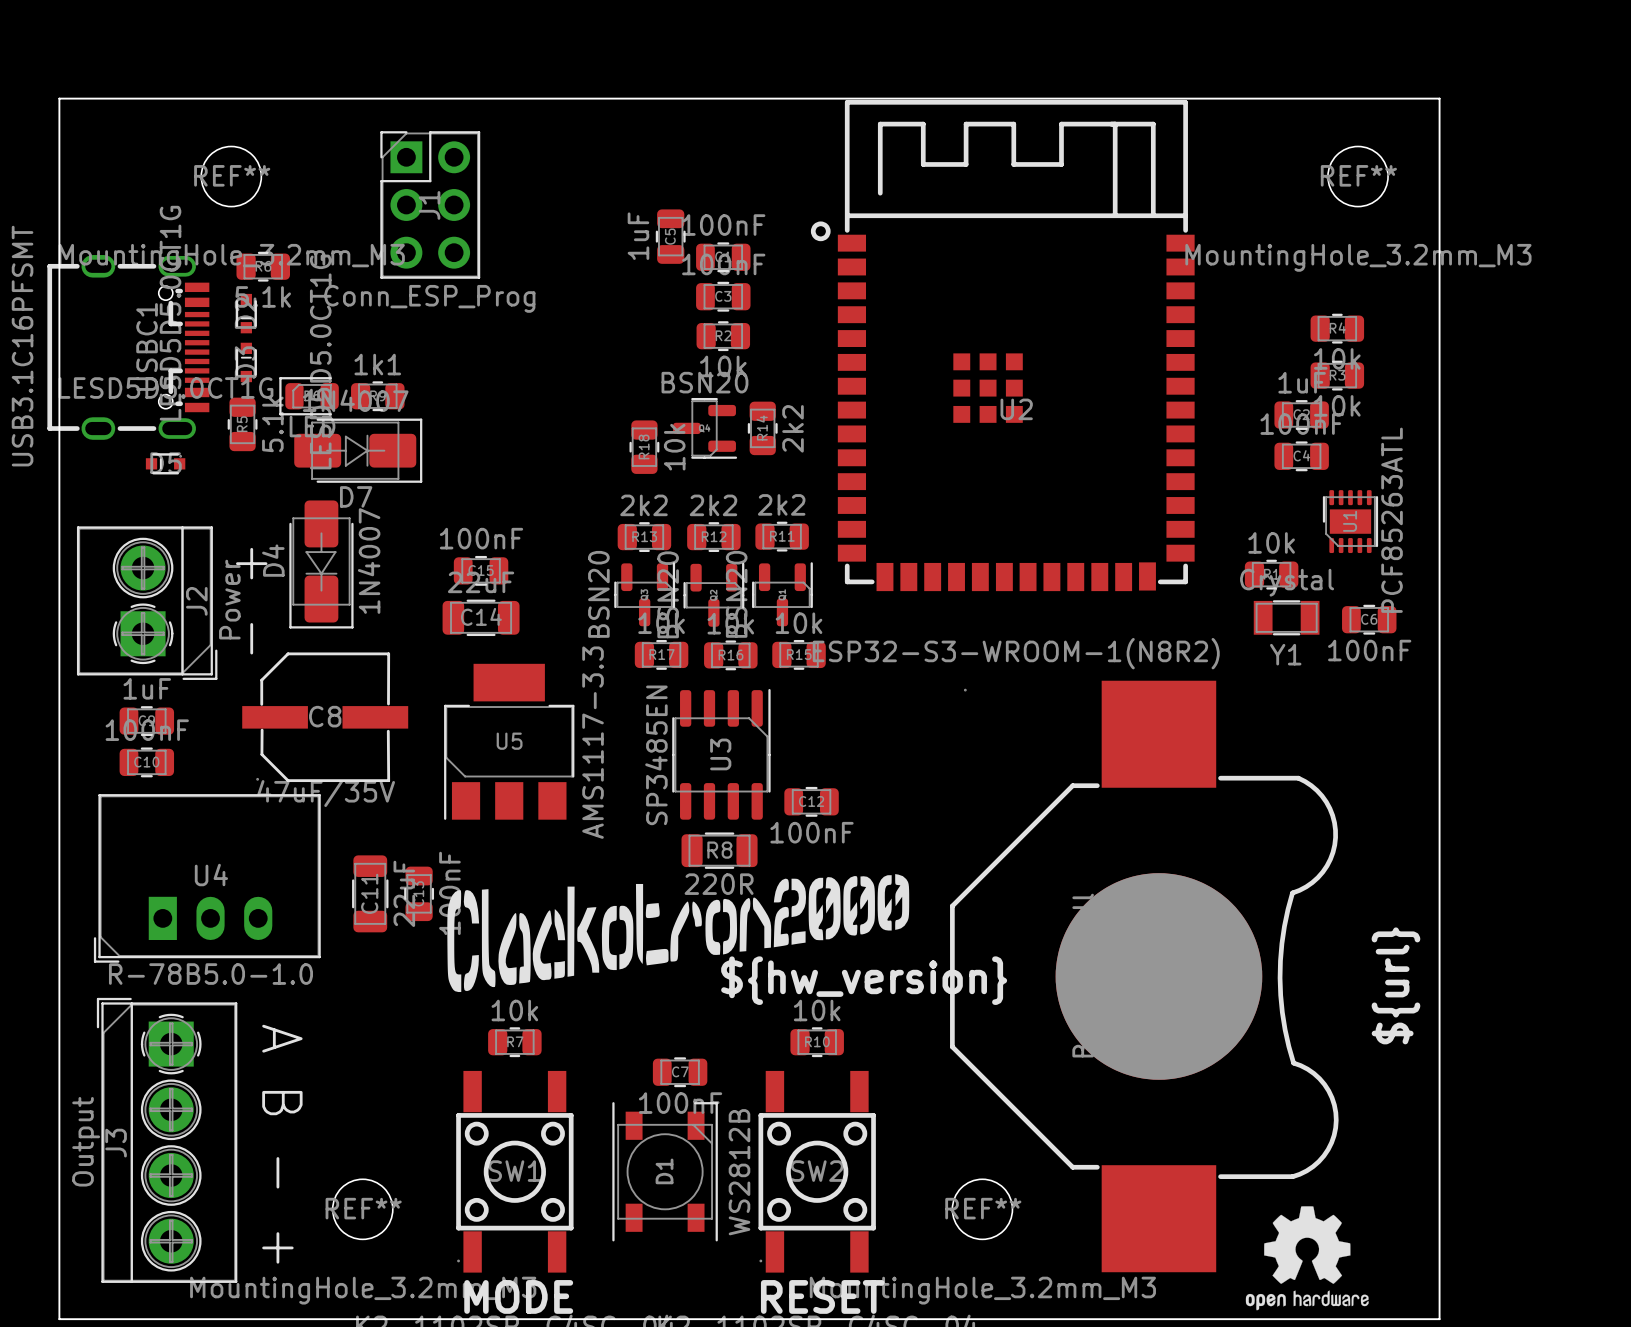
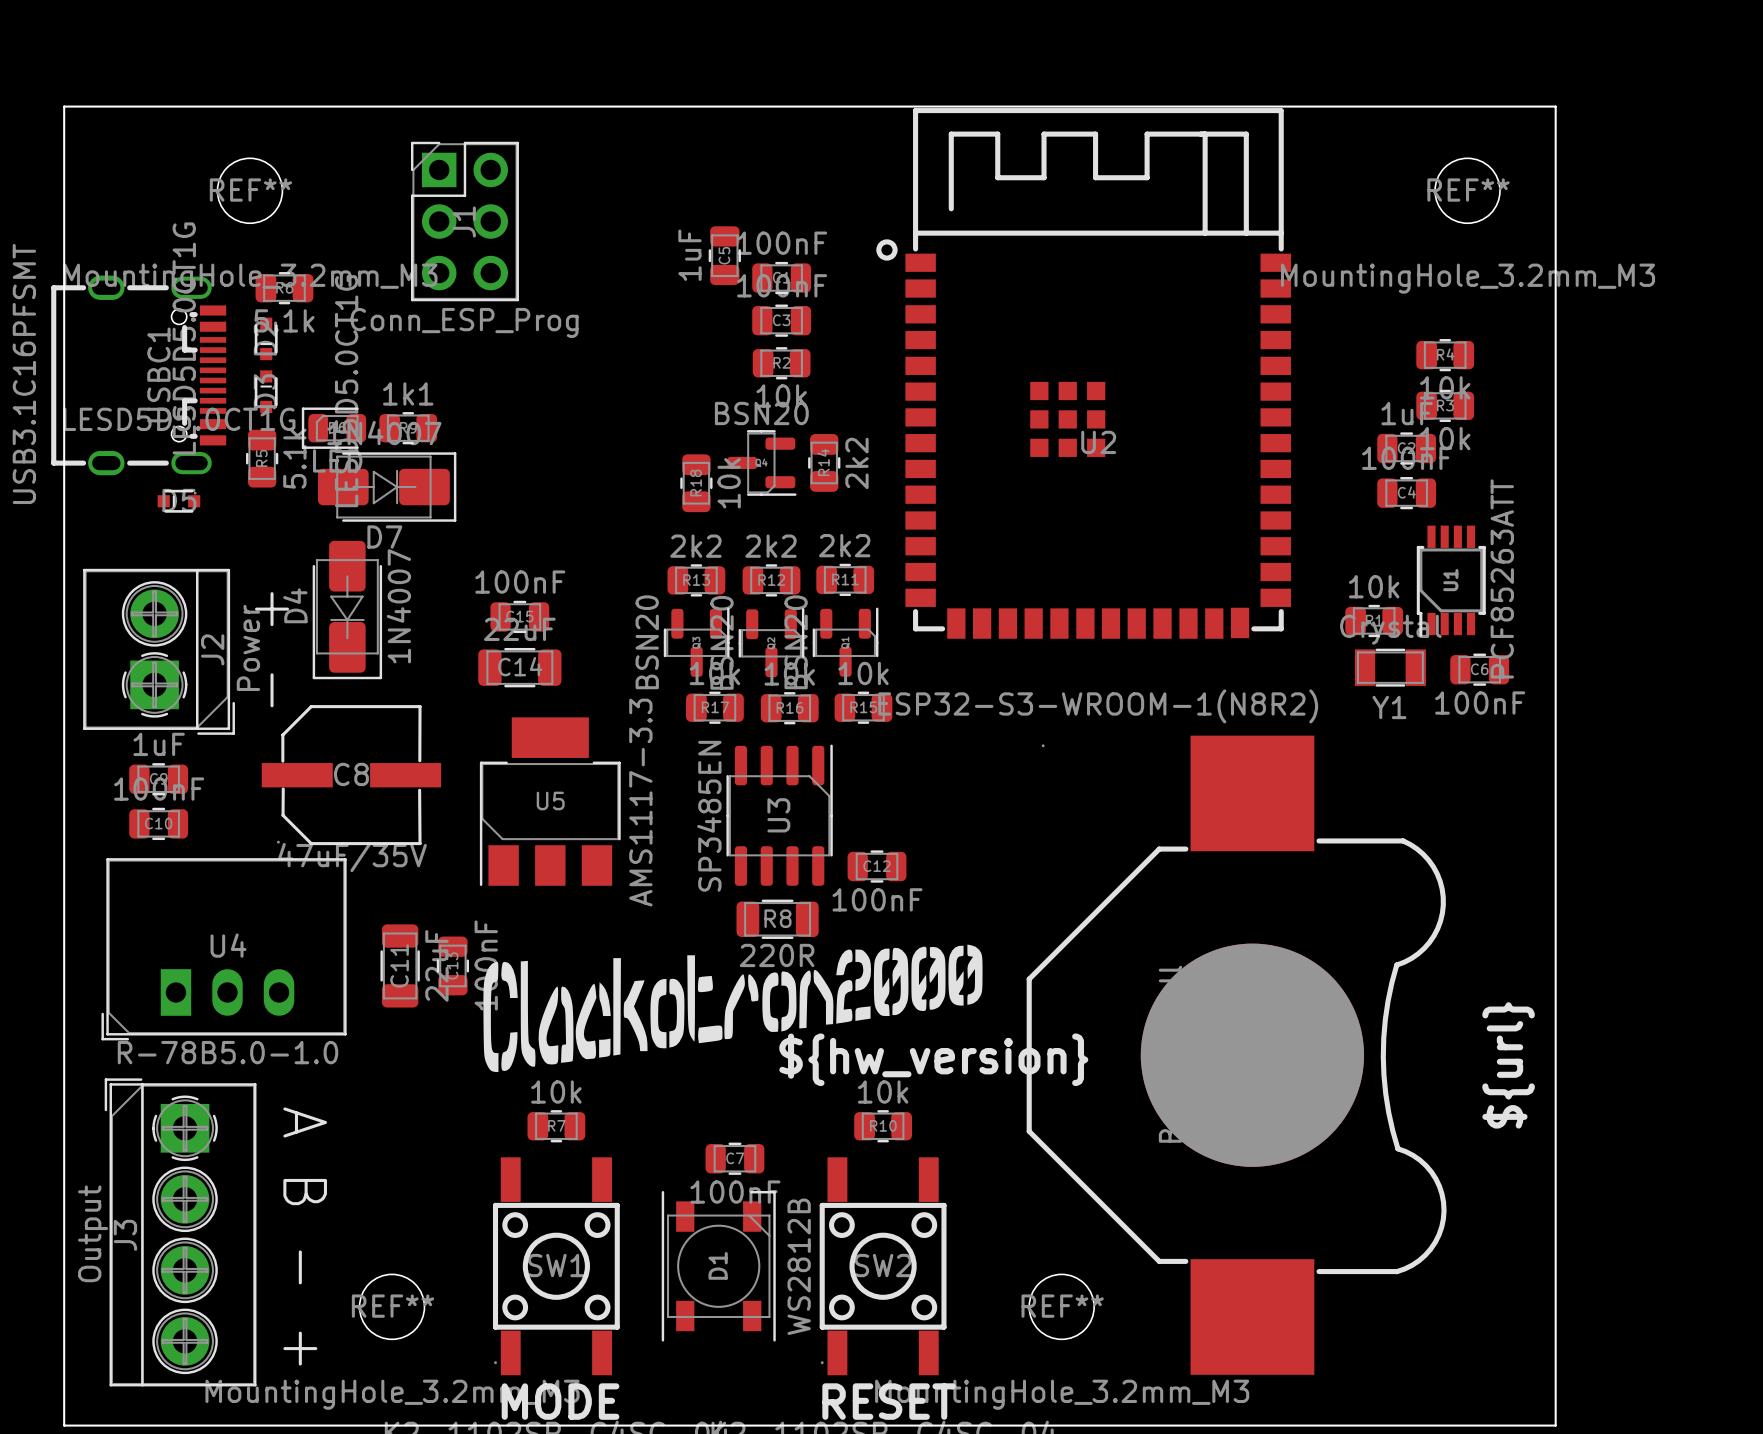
U1 footprint: [1322, 490, 1379, 554] -> [1416, 525, 1486, 637]
U1 value: PCF85263ATL (1392, 520) -> PCF85263ATT (1502, 578)
drawing: [1245, 1206, 1369, 1311] -> none

